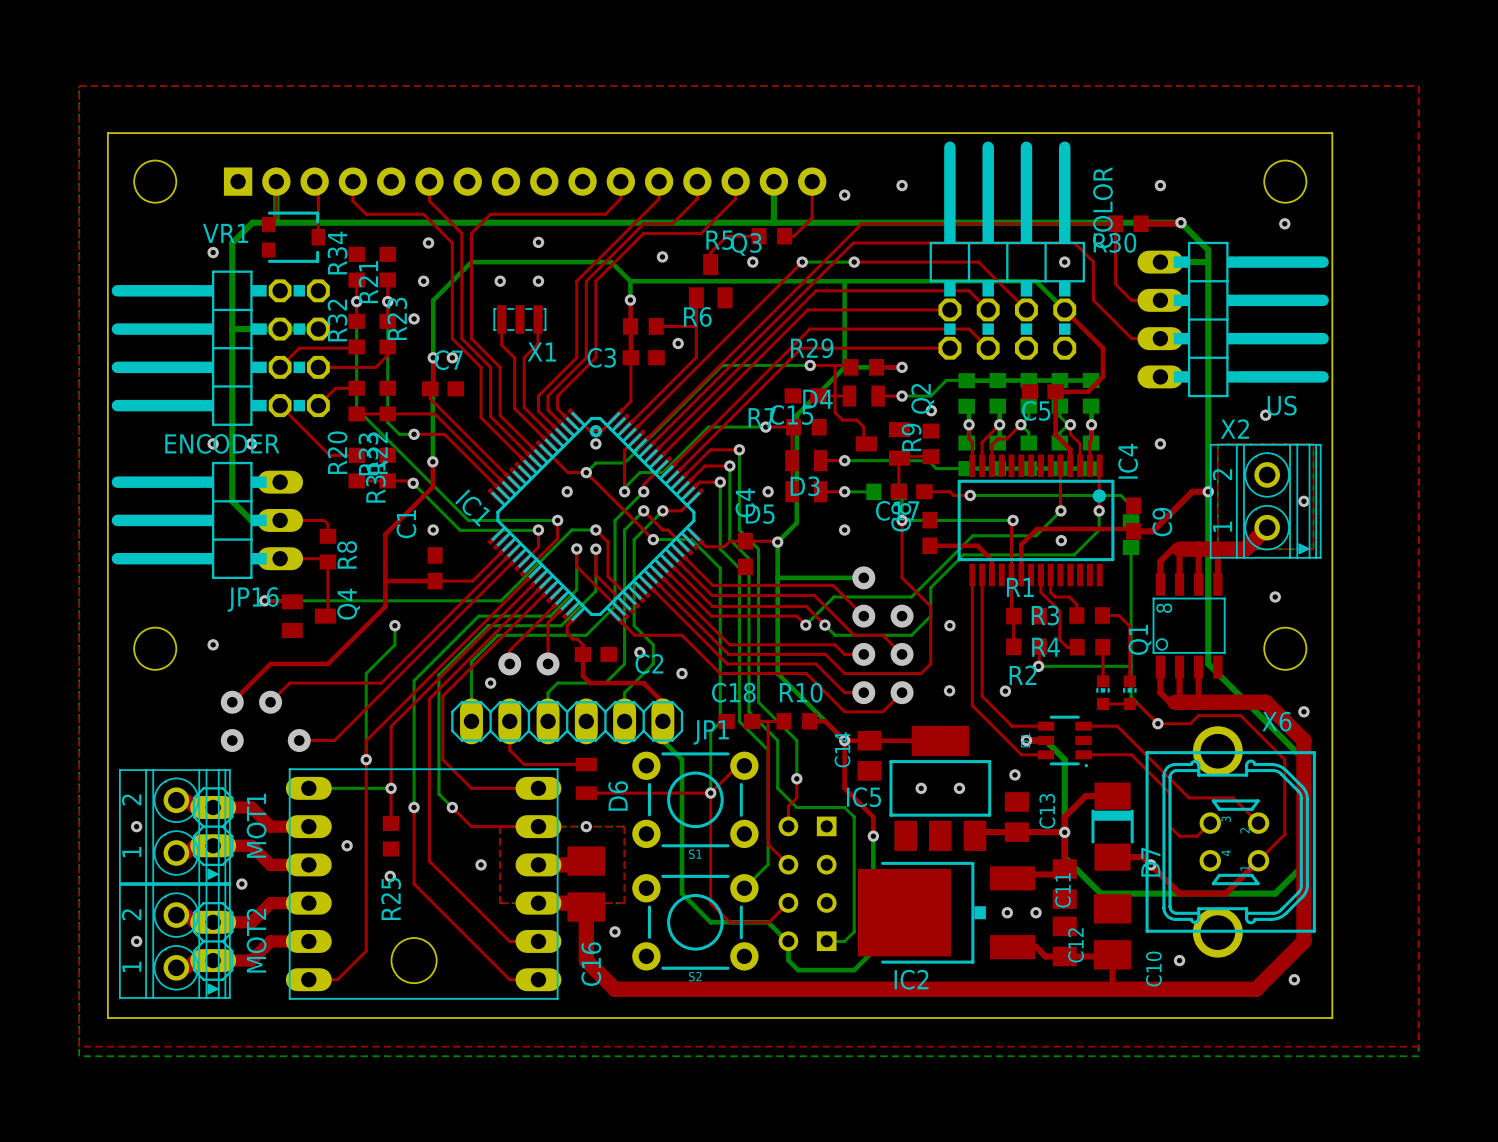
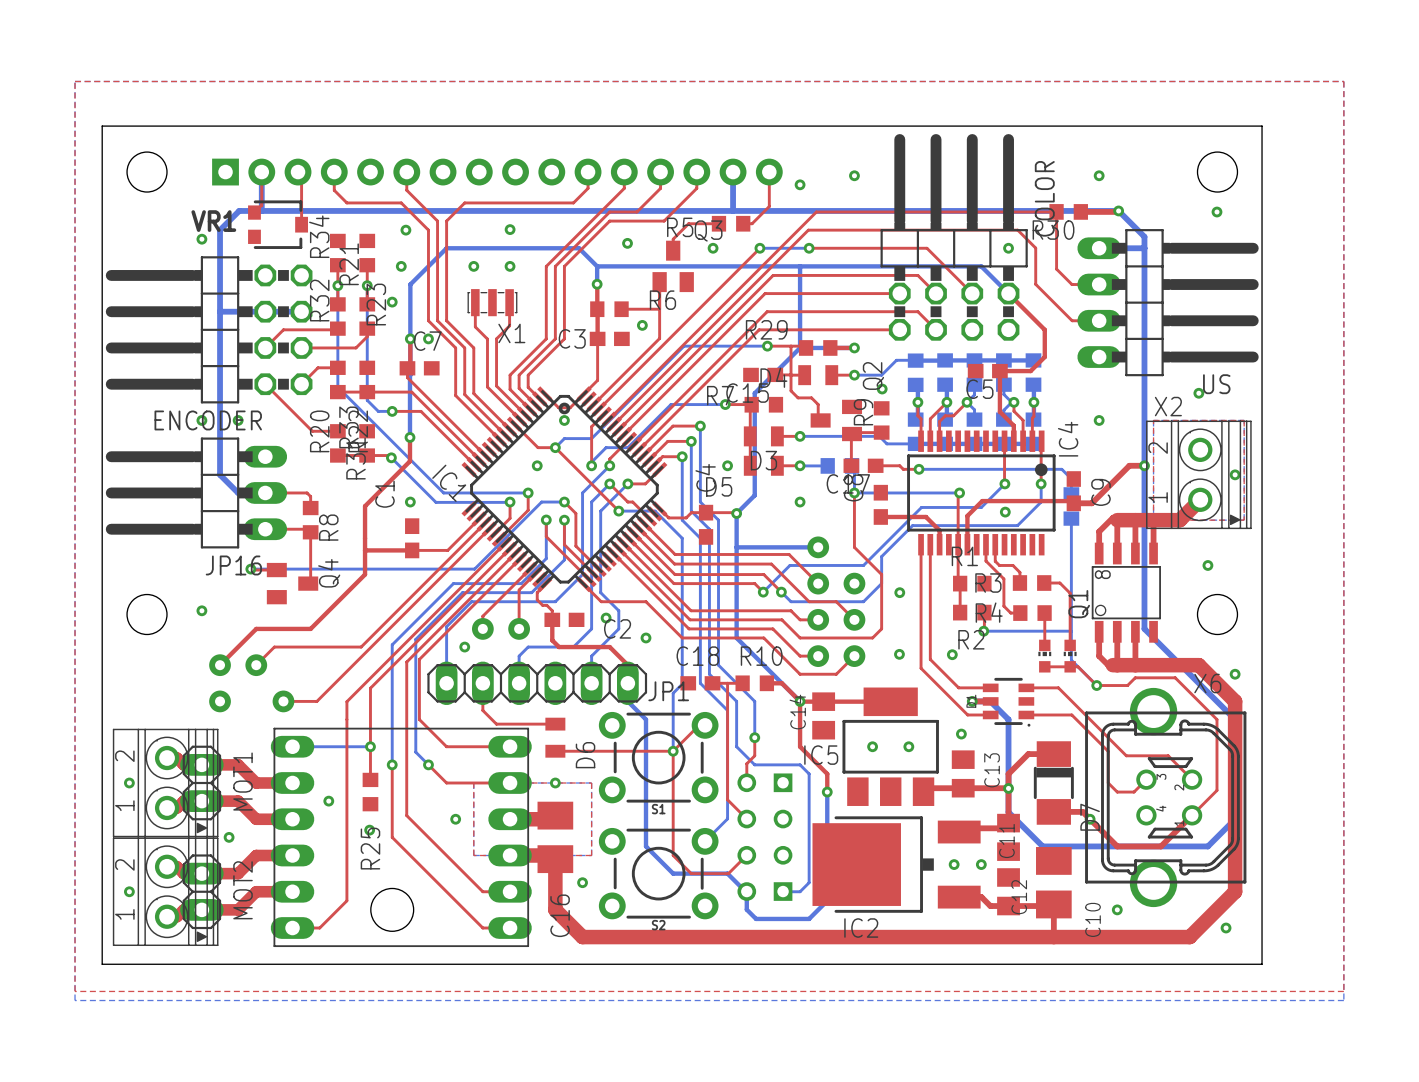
bottom track: (394, 625) (394, 644) (366, 673) (366, 759) -> none
via: (394, 625) -> none
via: (366, 759) -> none

